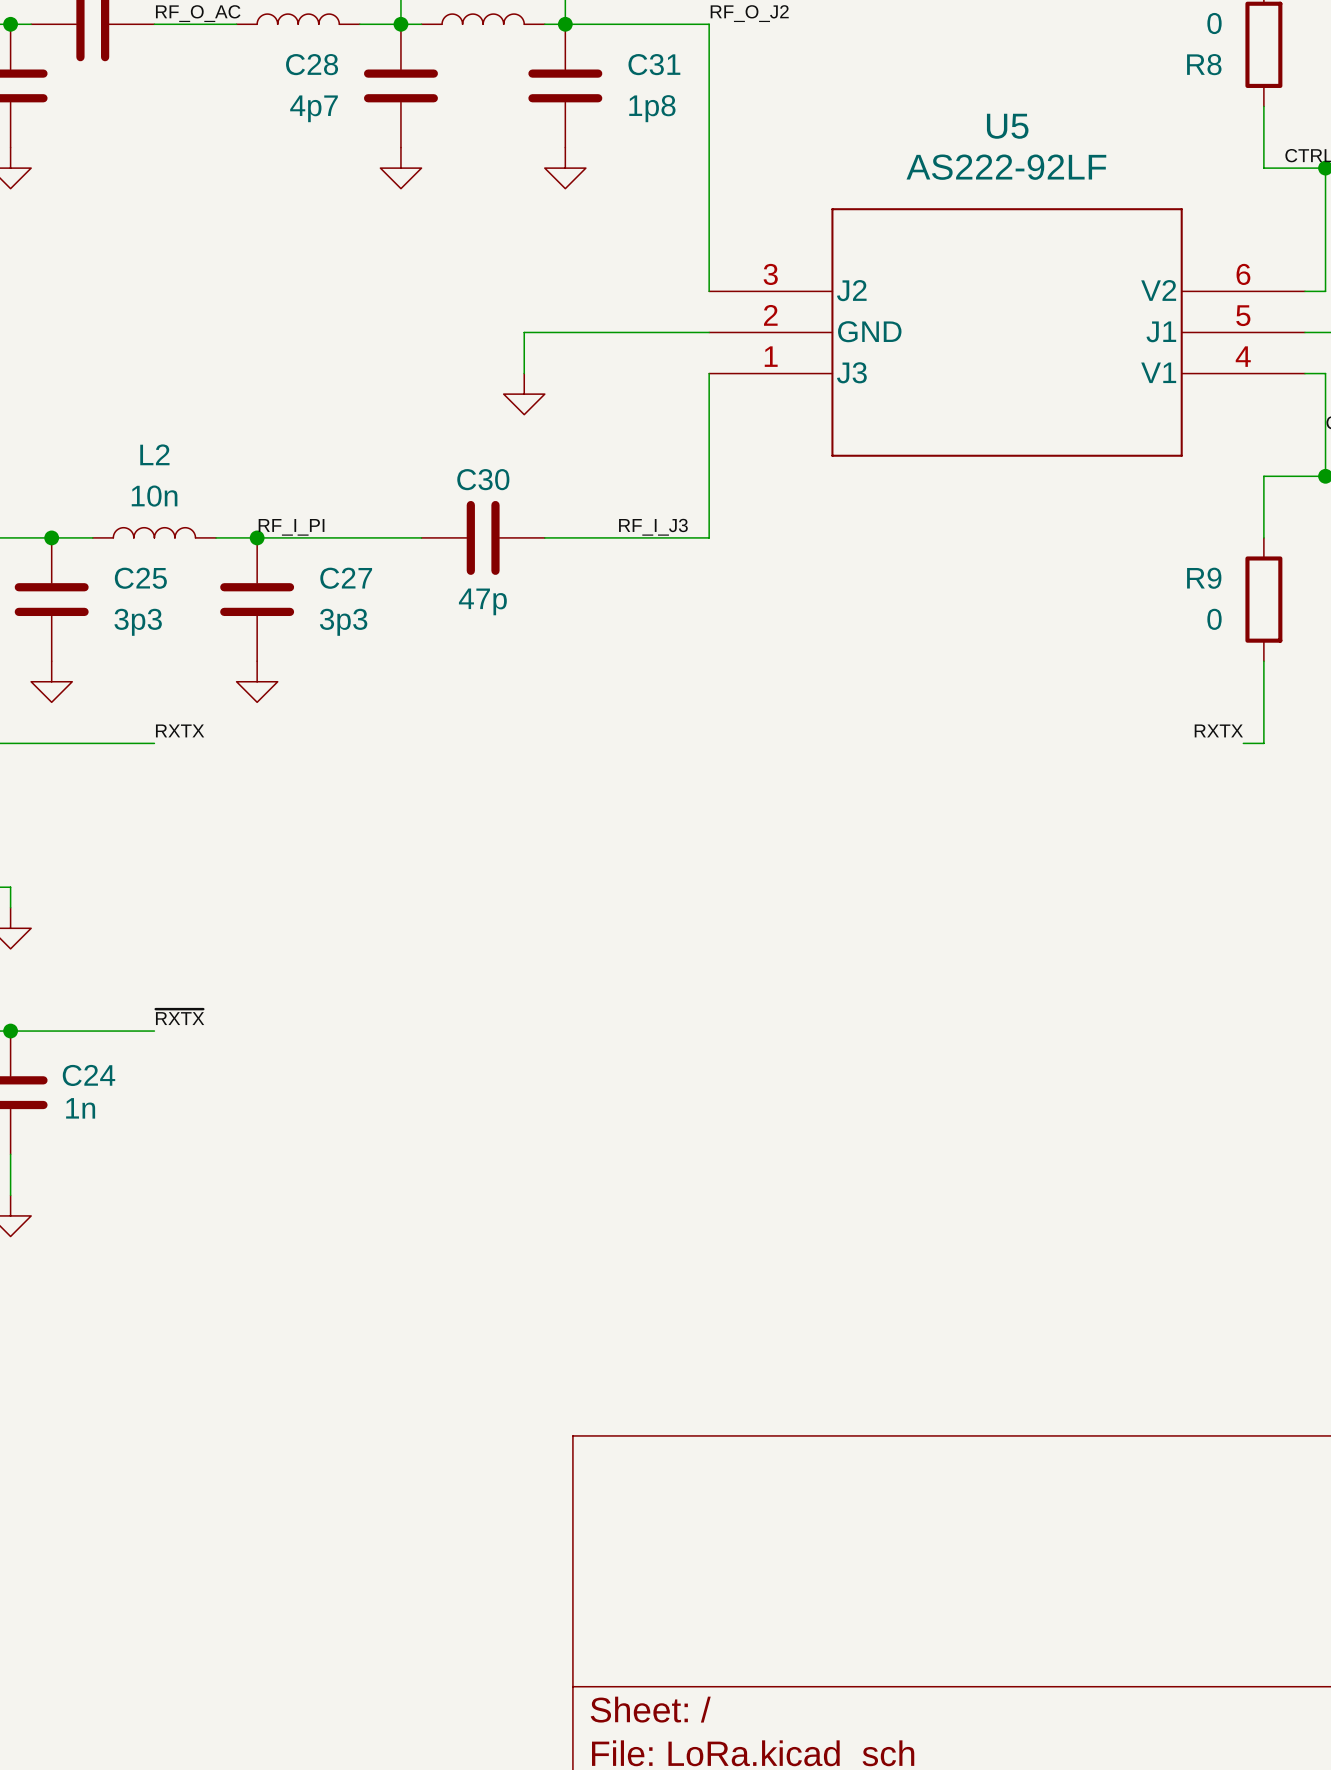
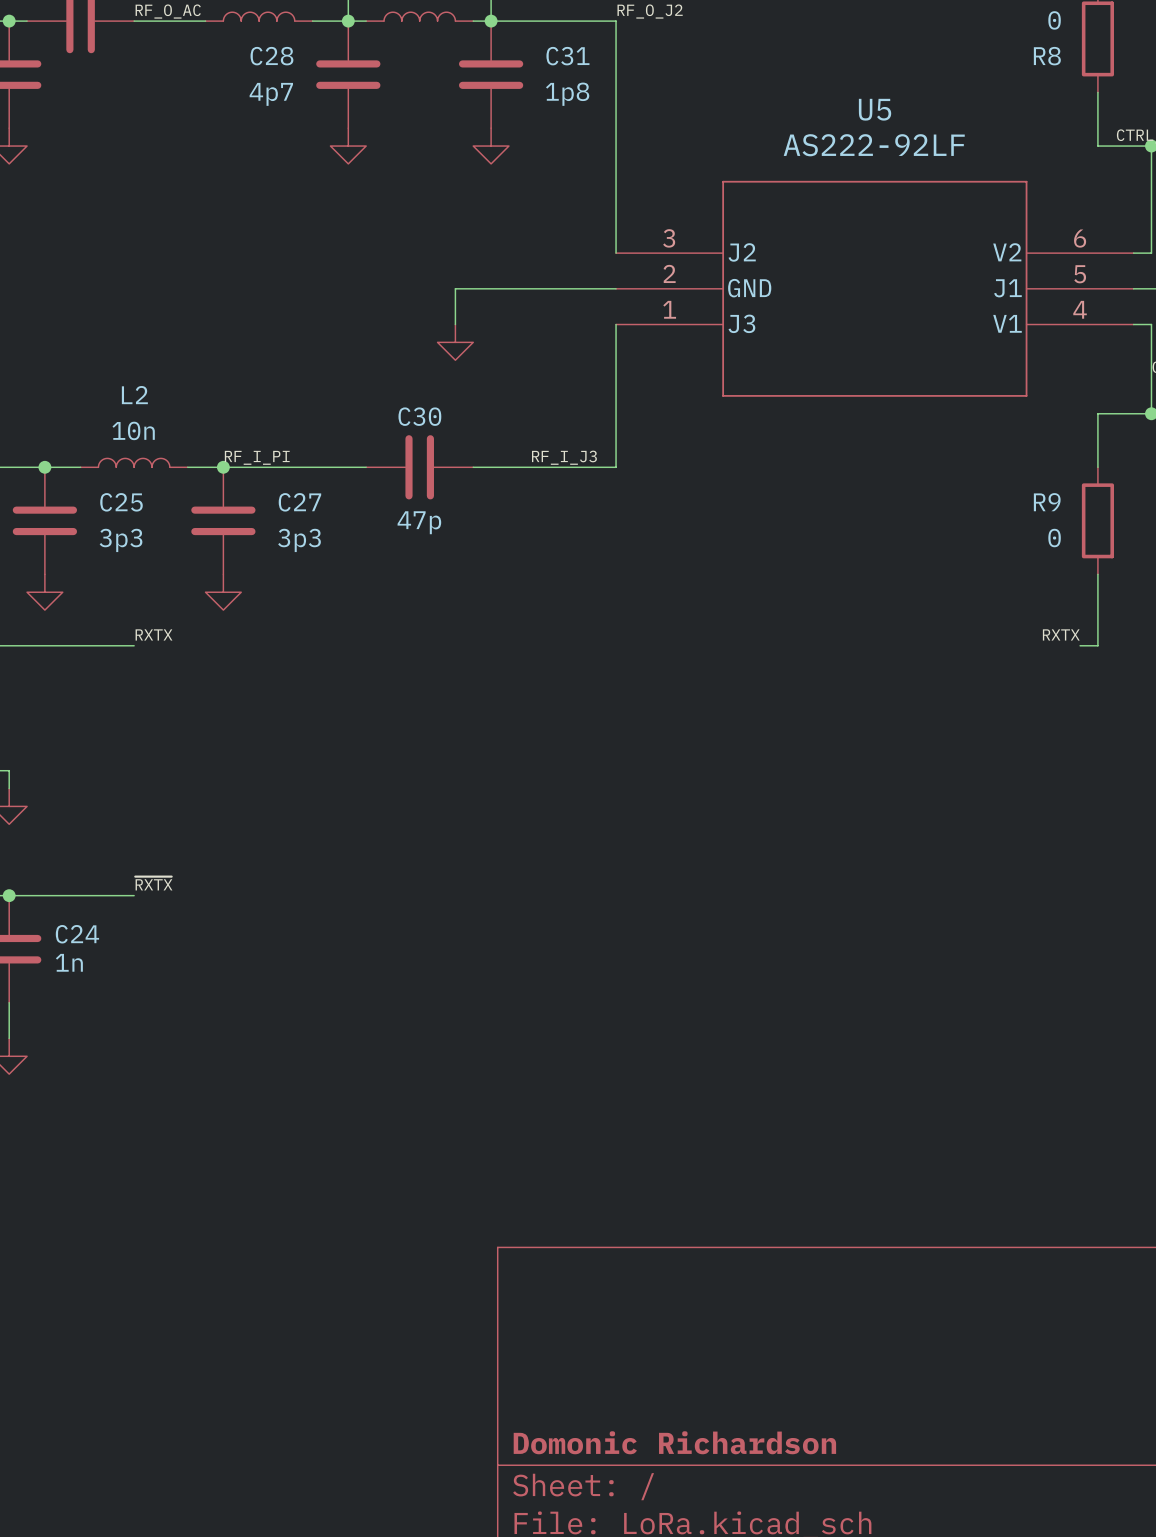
title block: none -> Domonic Richardson (674, 1442)

